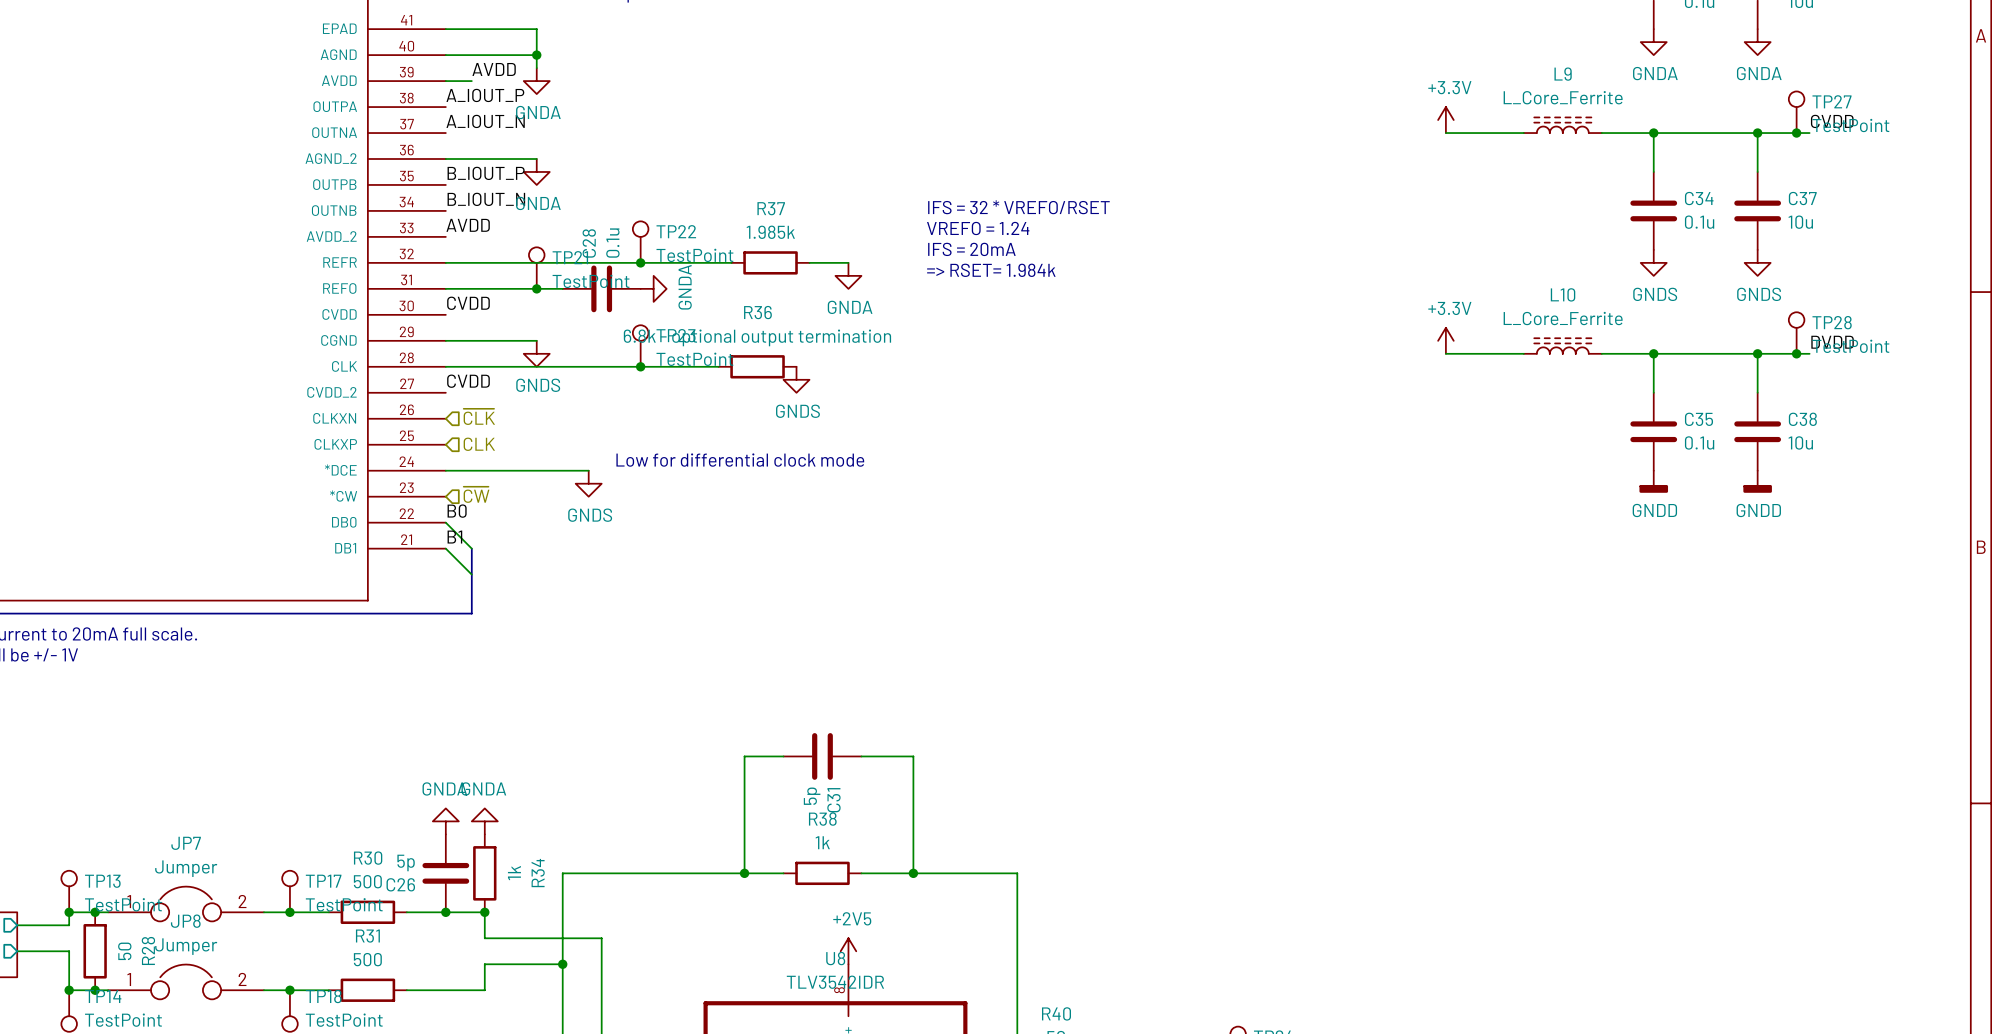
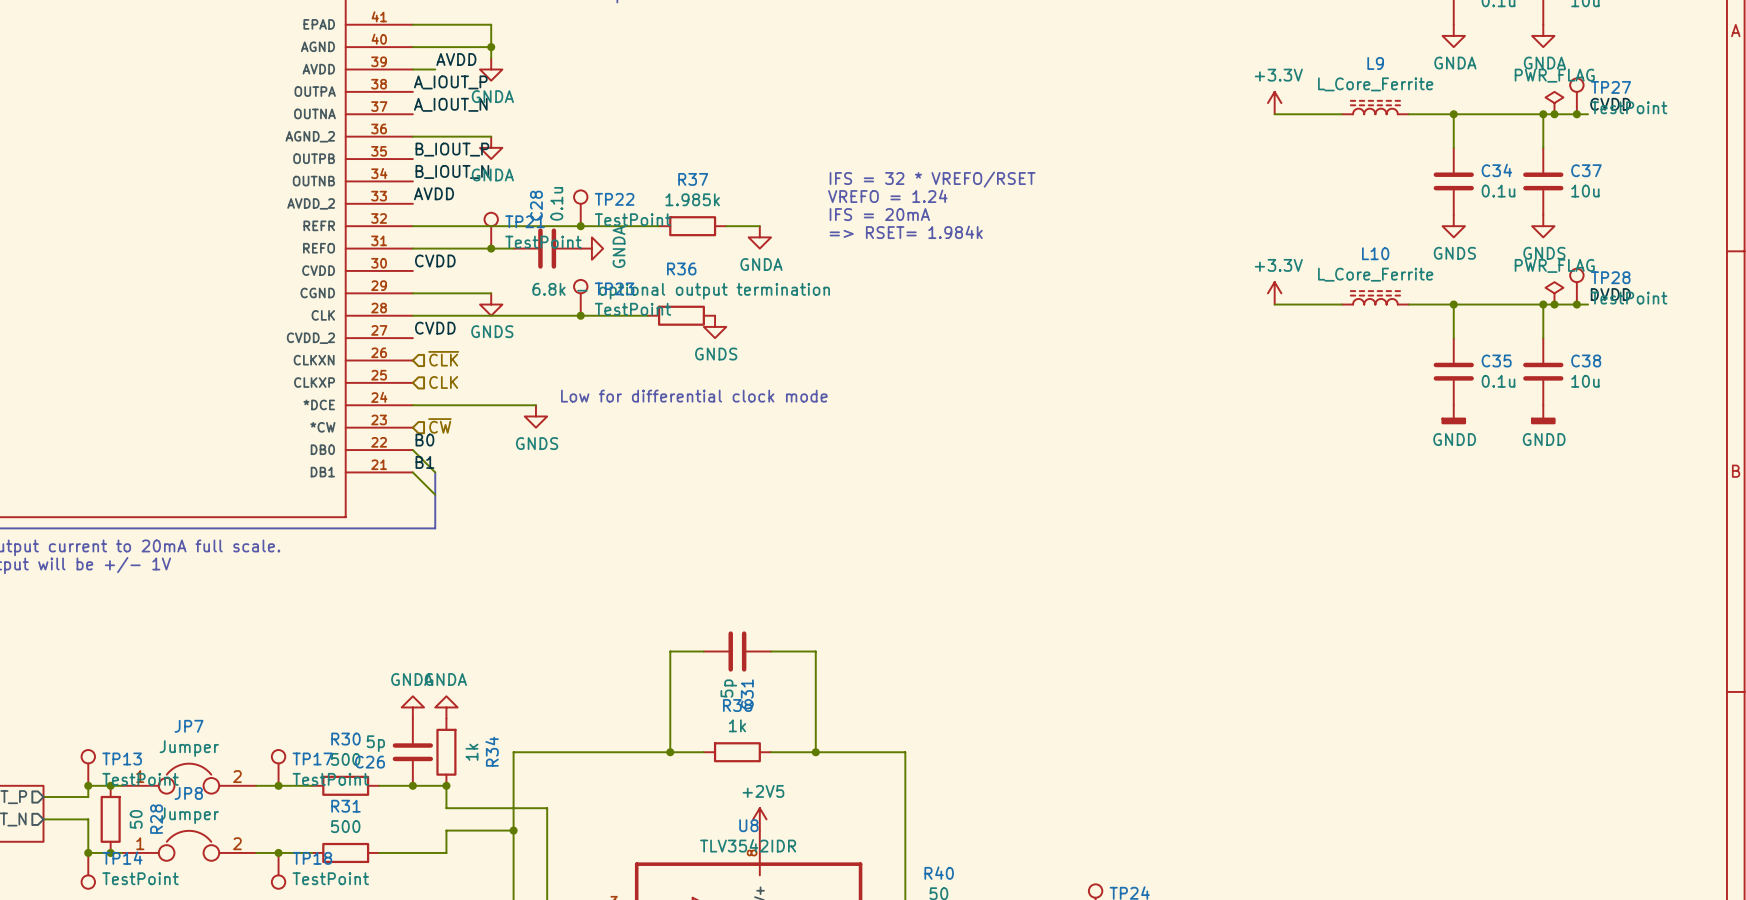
power symbol: none -> PWR_FLAG (1554, 103)
junction: none -> (1554, 114)
power symbol: none -> PWR_FLAG (1554, 293)
junction: none -> (1554, 304)

